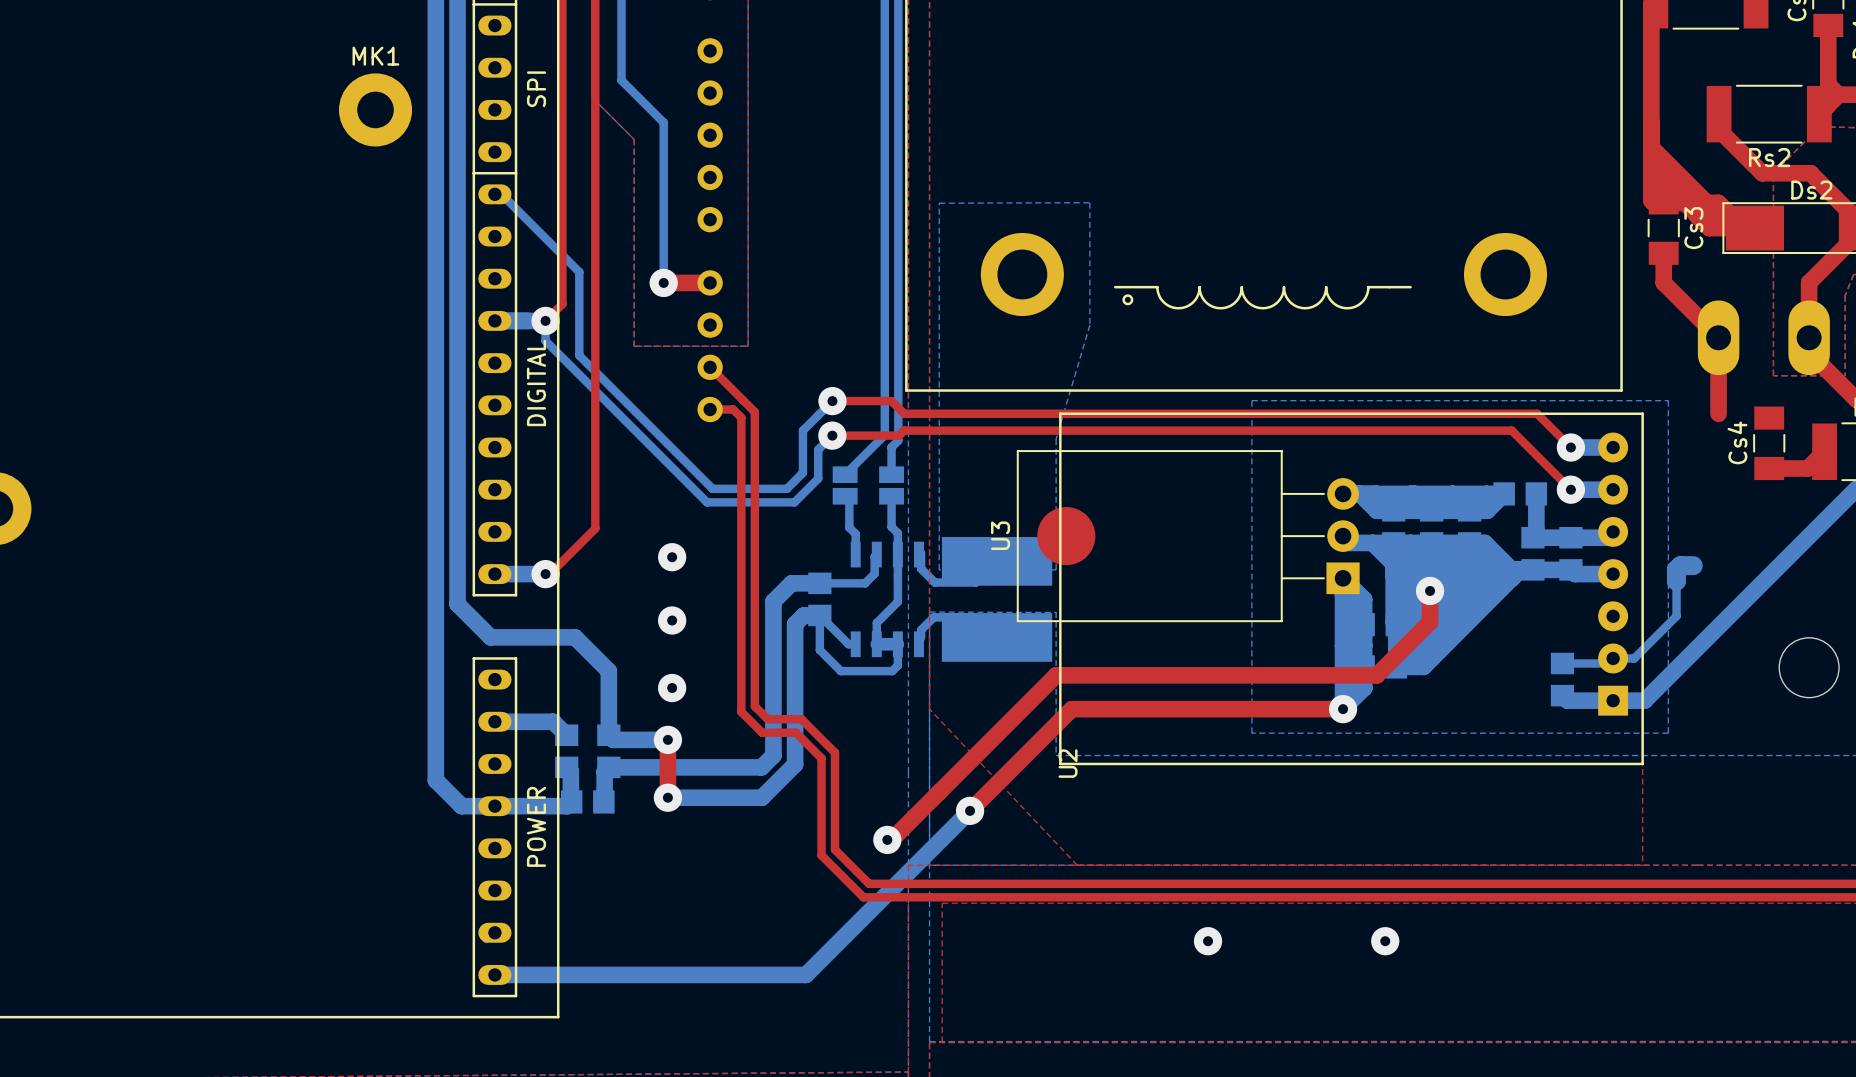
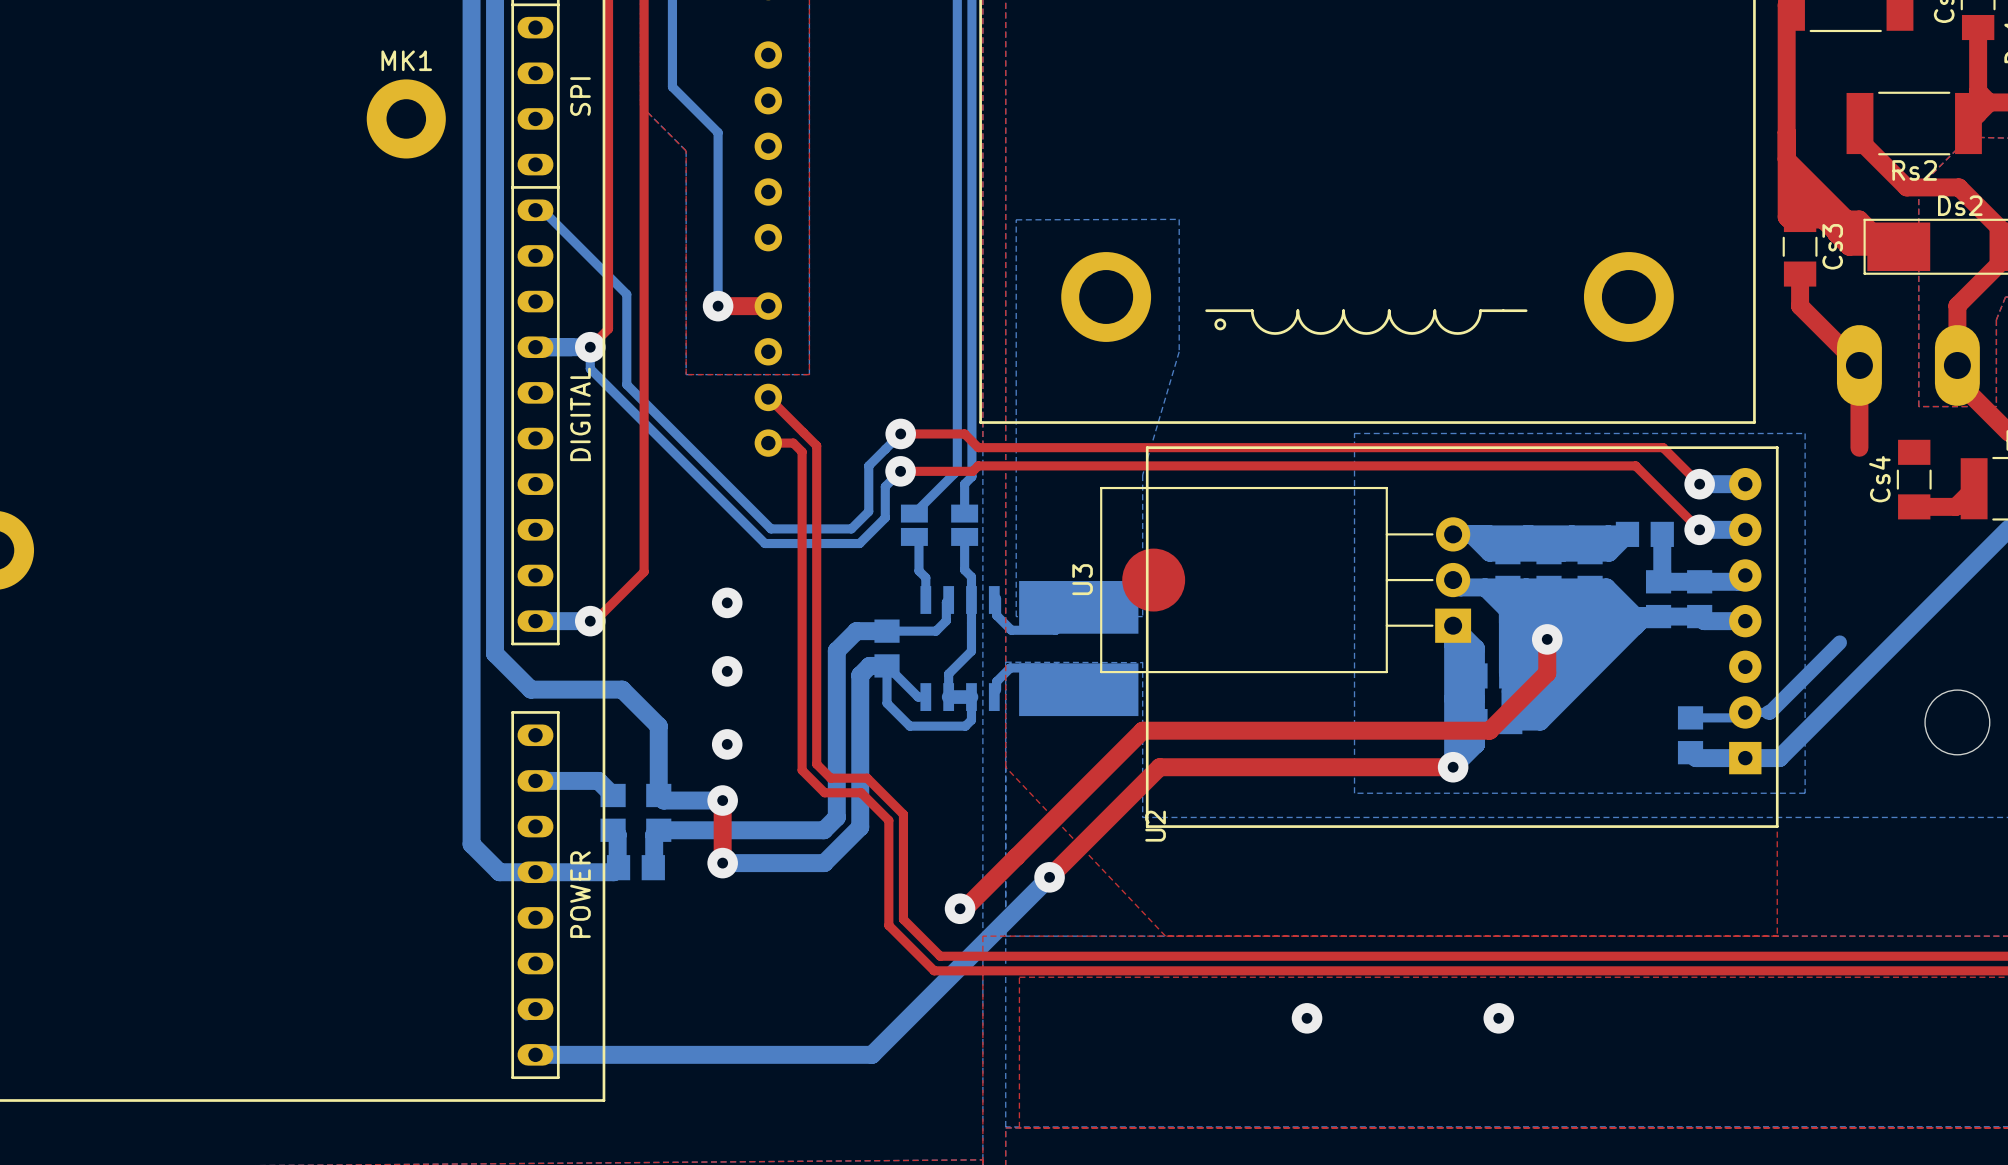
bottom track: (1693, 565) (1680, 565) (1676, 569) (1676, 581) -> none
bottom track: (1676, 581) (1676, 616) (1634, 658) -> (1839, 642) (1768, 712)

